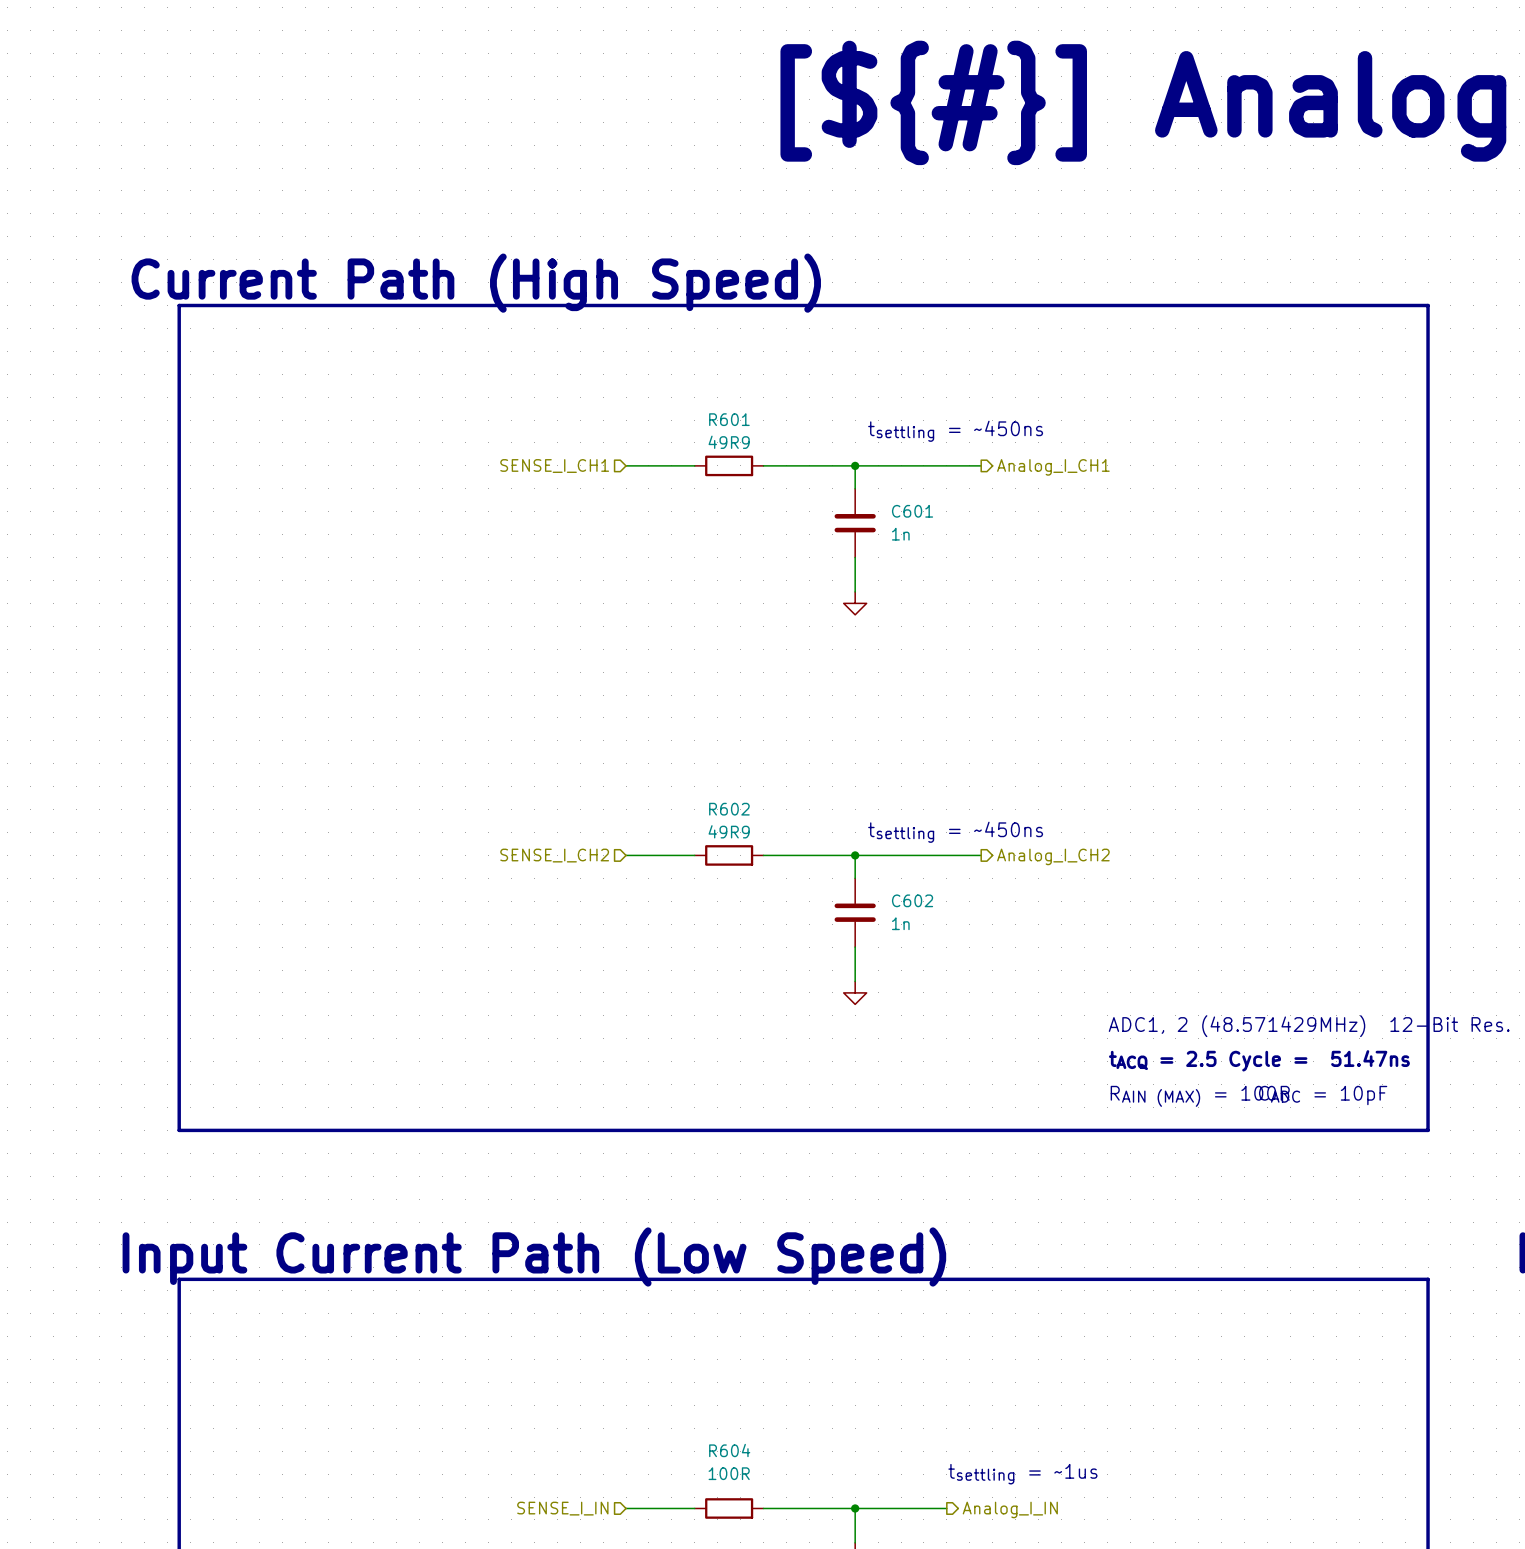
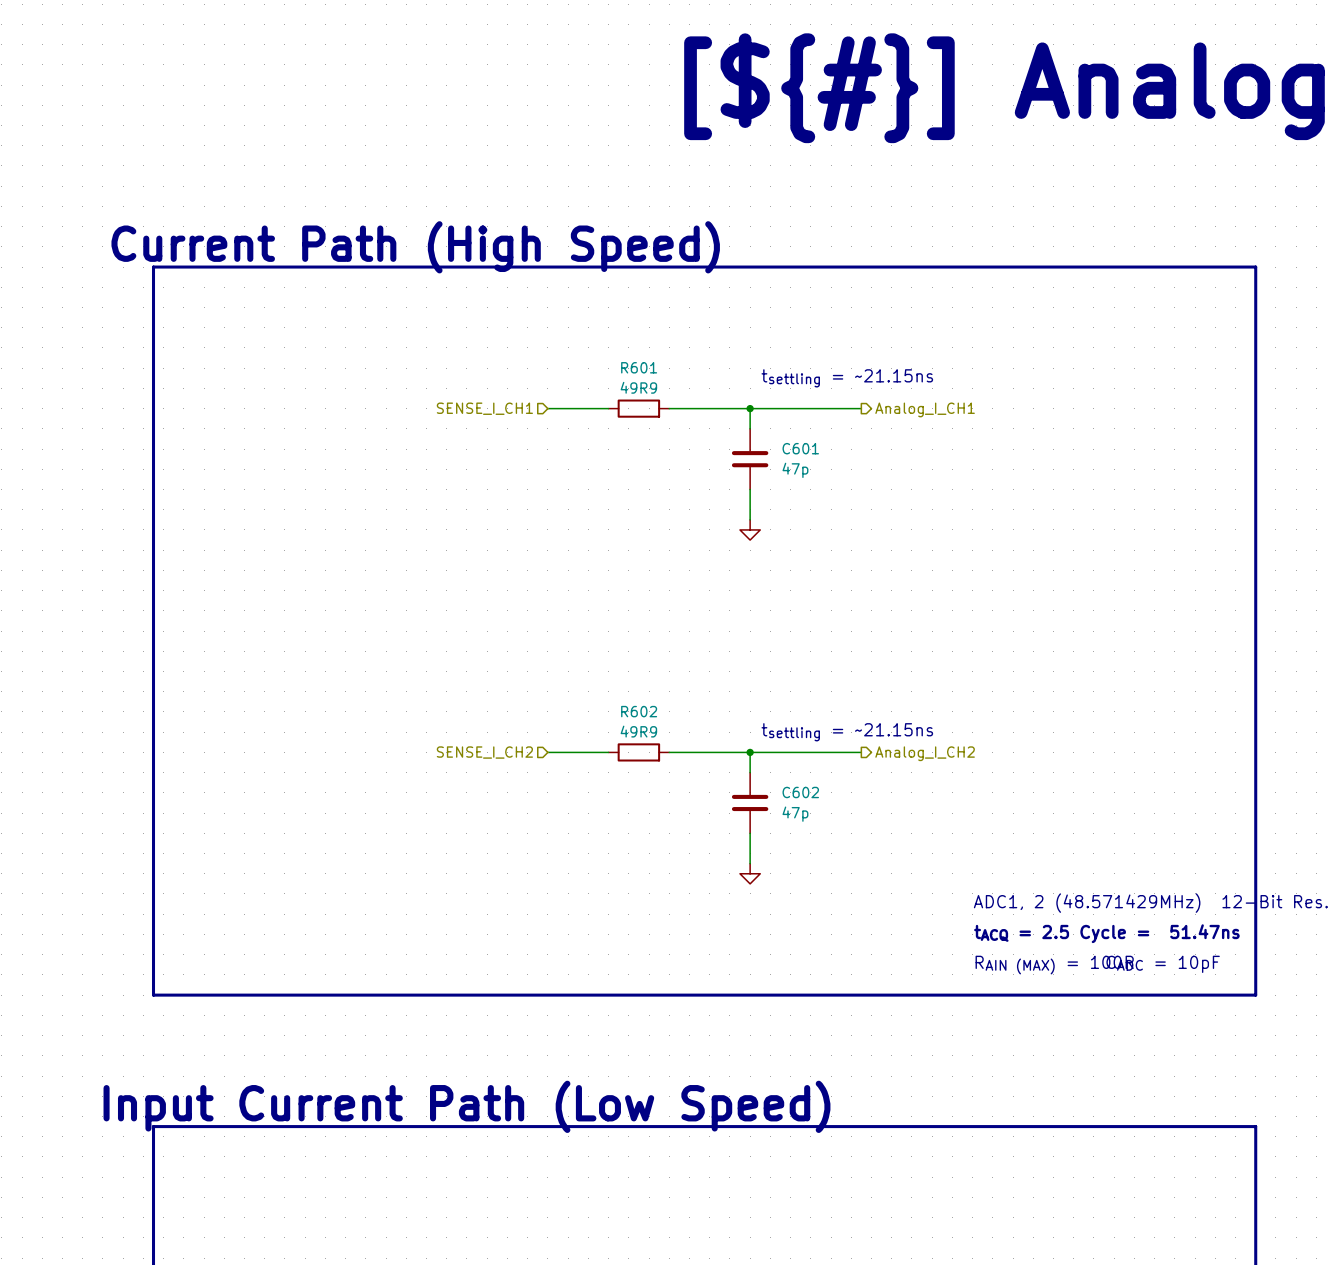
text: tsettling = ~450ns (955, 431) -> tsettling = ~21.15ns (847, 378)
C601 value: 1n (900, 534) -> 47p (795, 470)
text: tsettling = ~450ns (955, 832) -> tsettling = ~21.15ns (847, 732)
C602 value: 1n (900, 923) -> 47p (795, 814)

